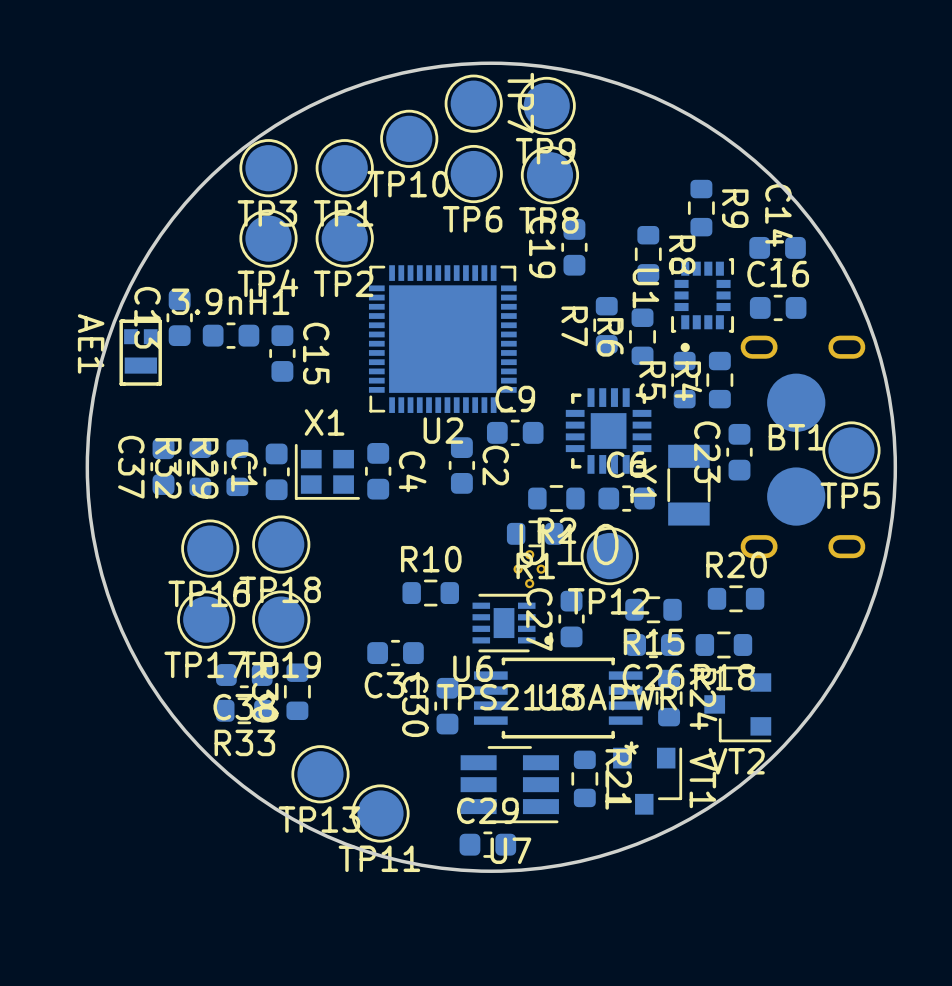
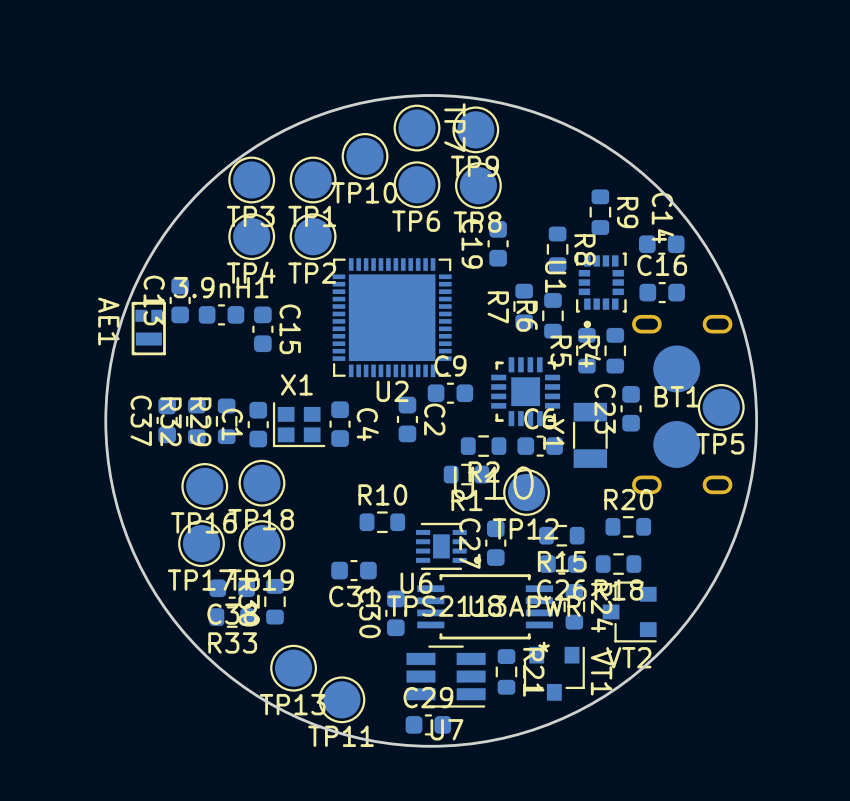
part: (529, 569) -> none

